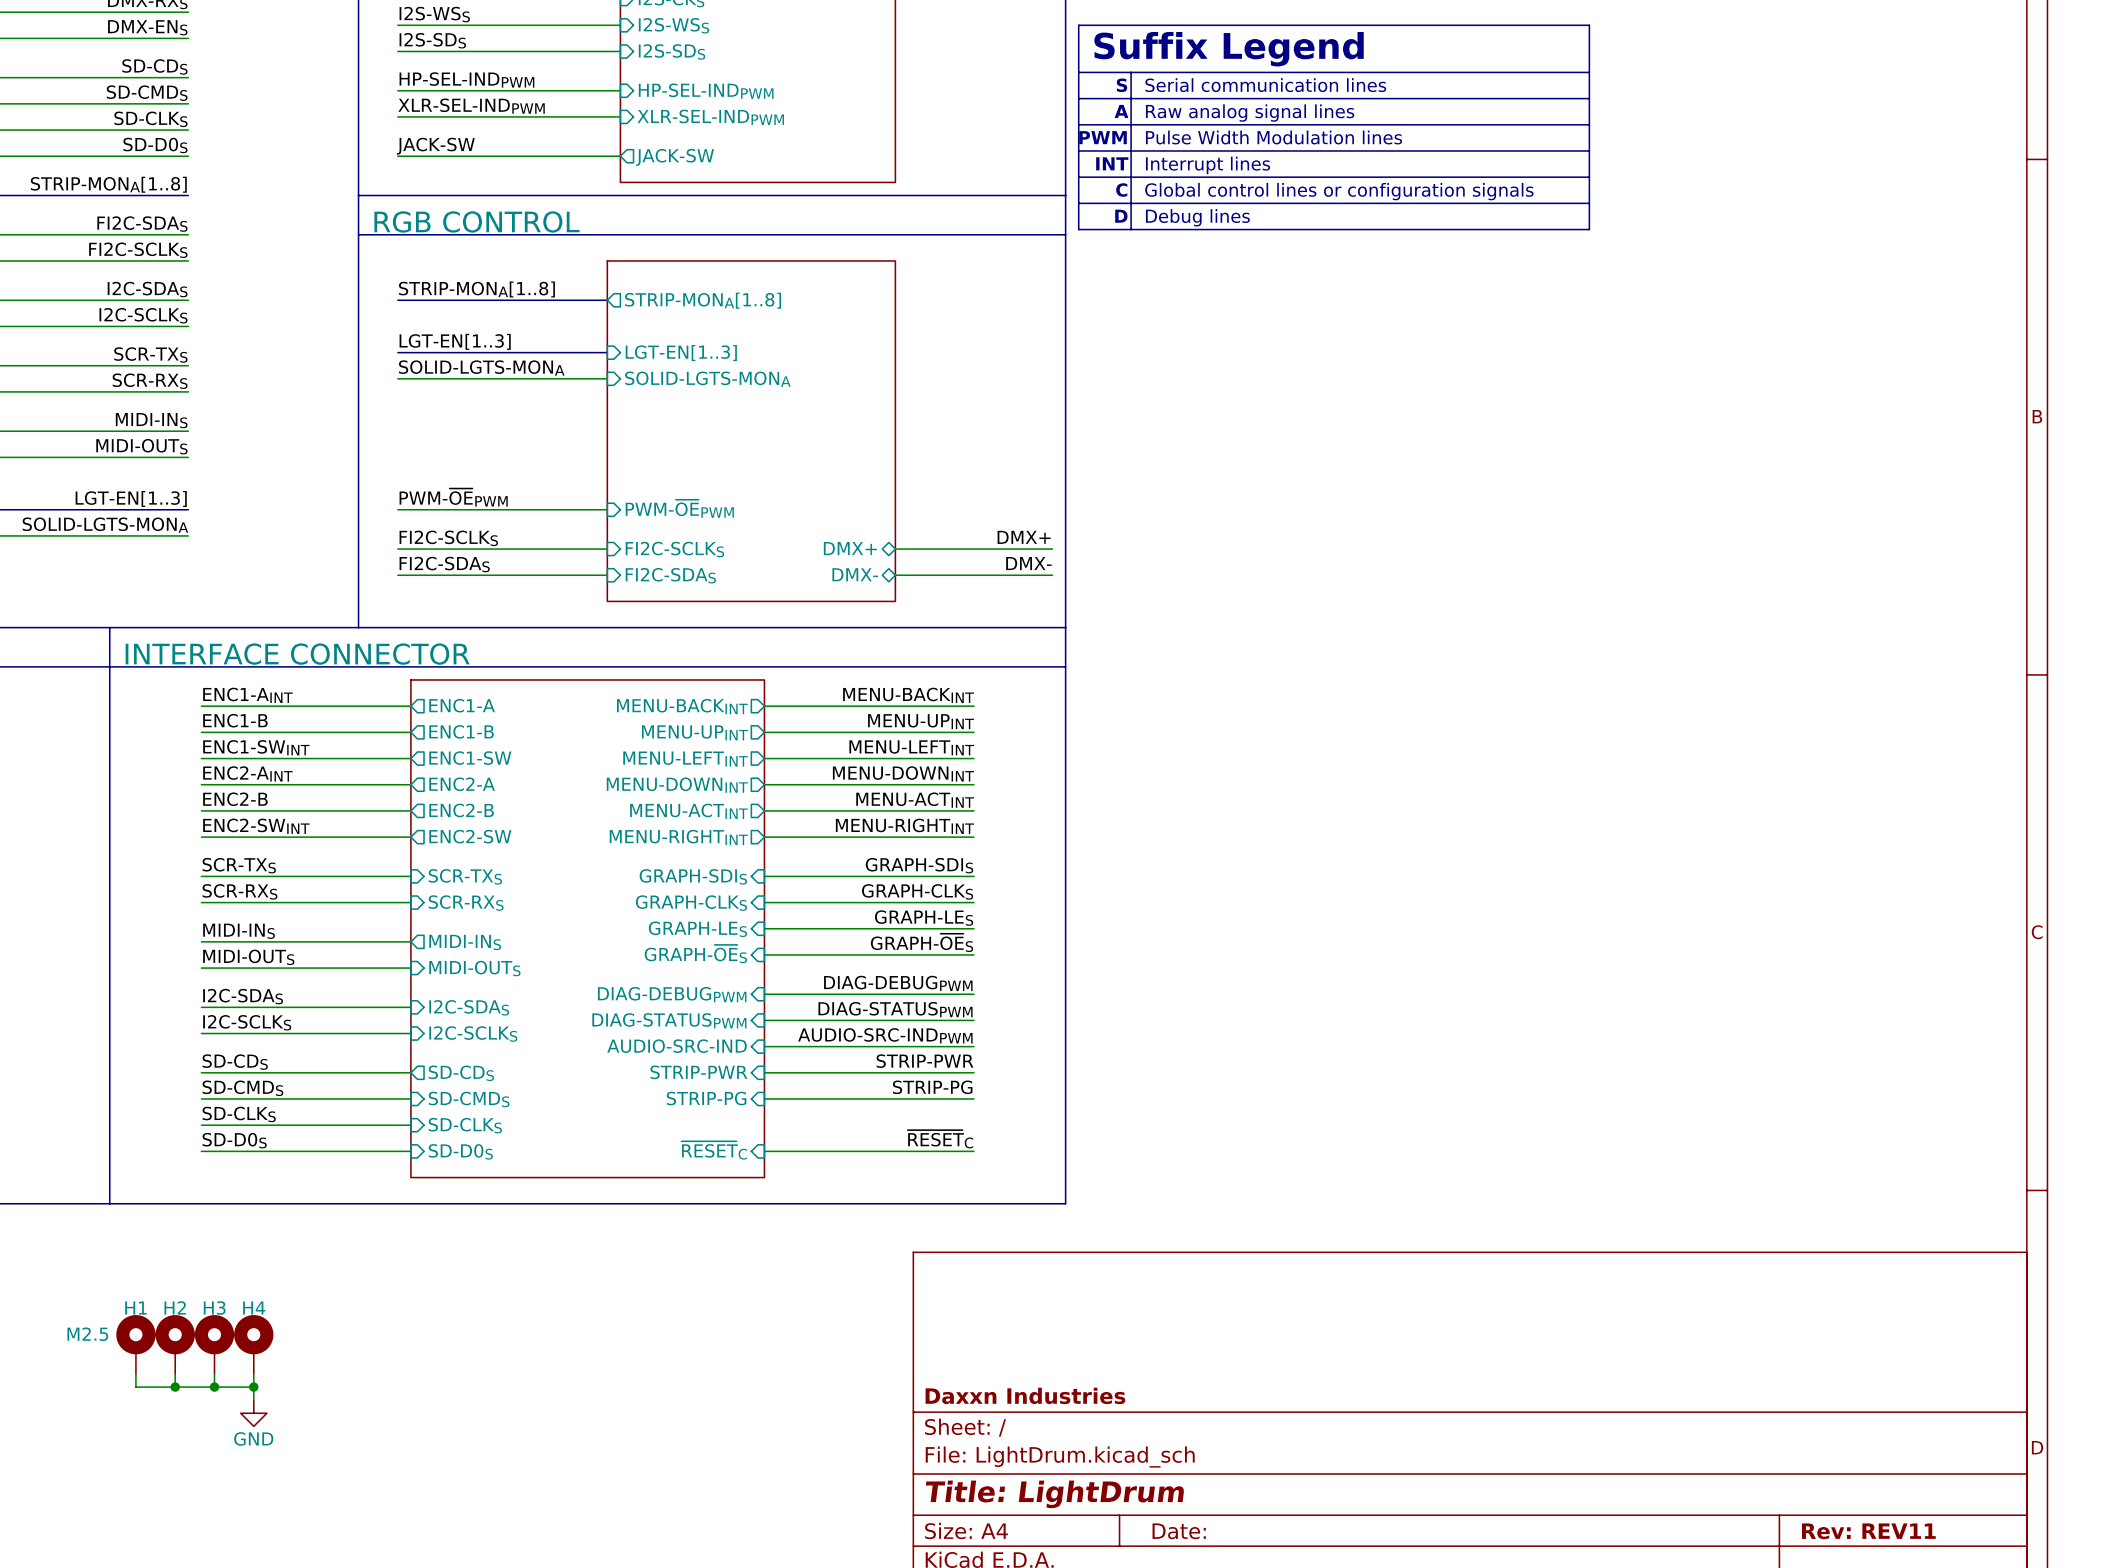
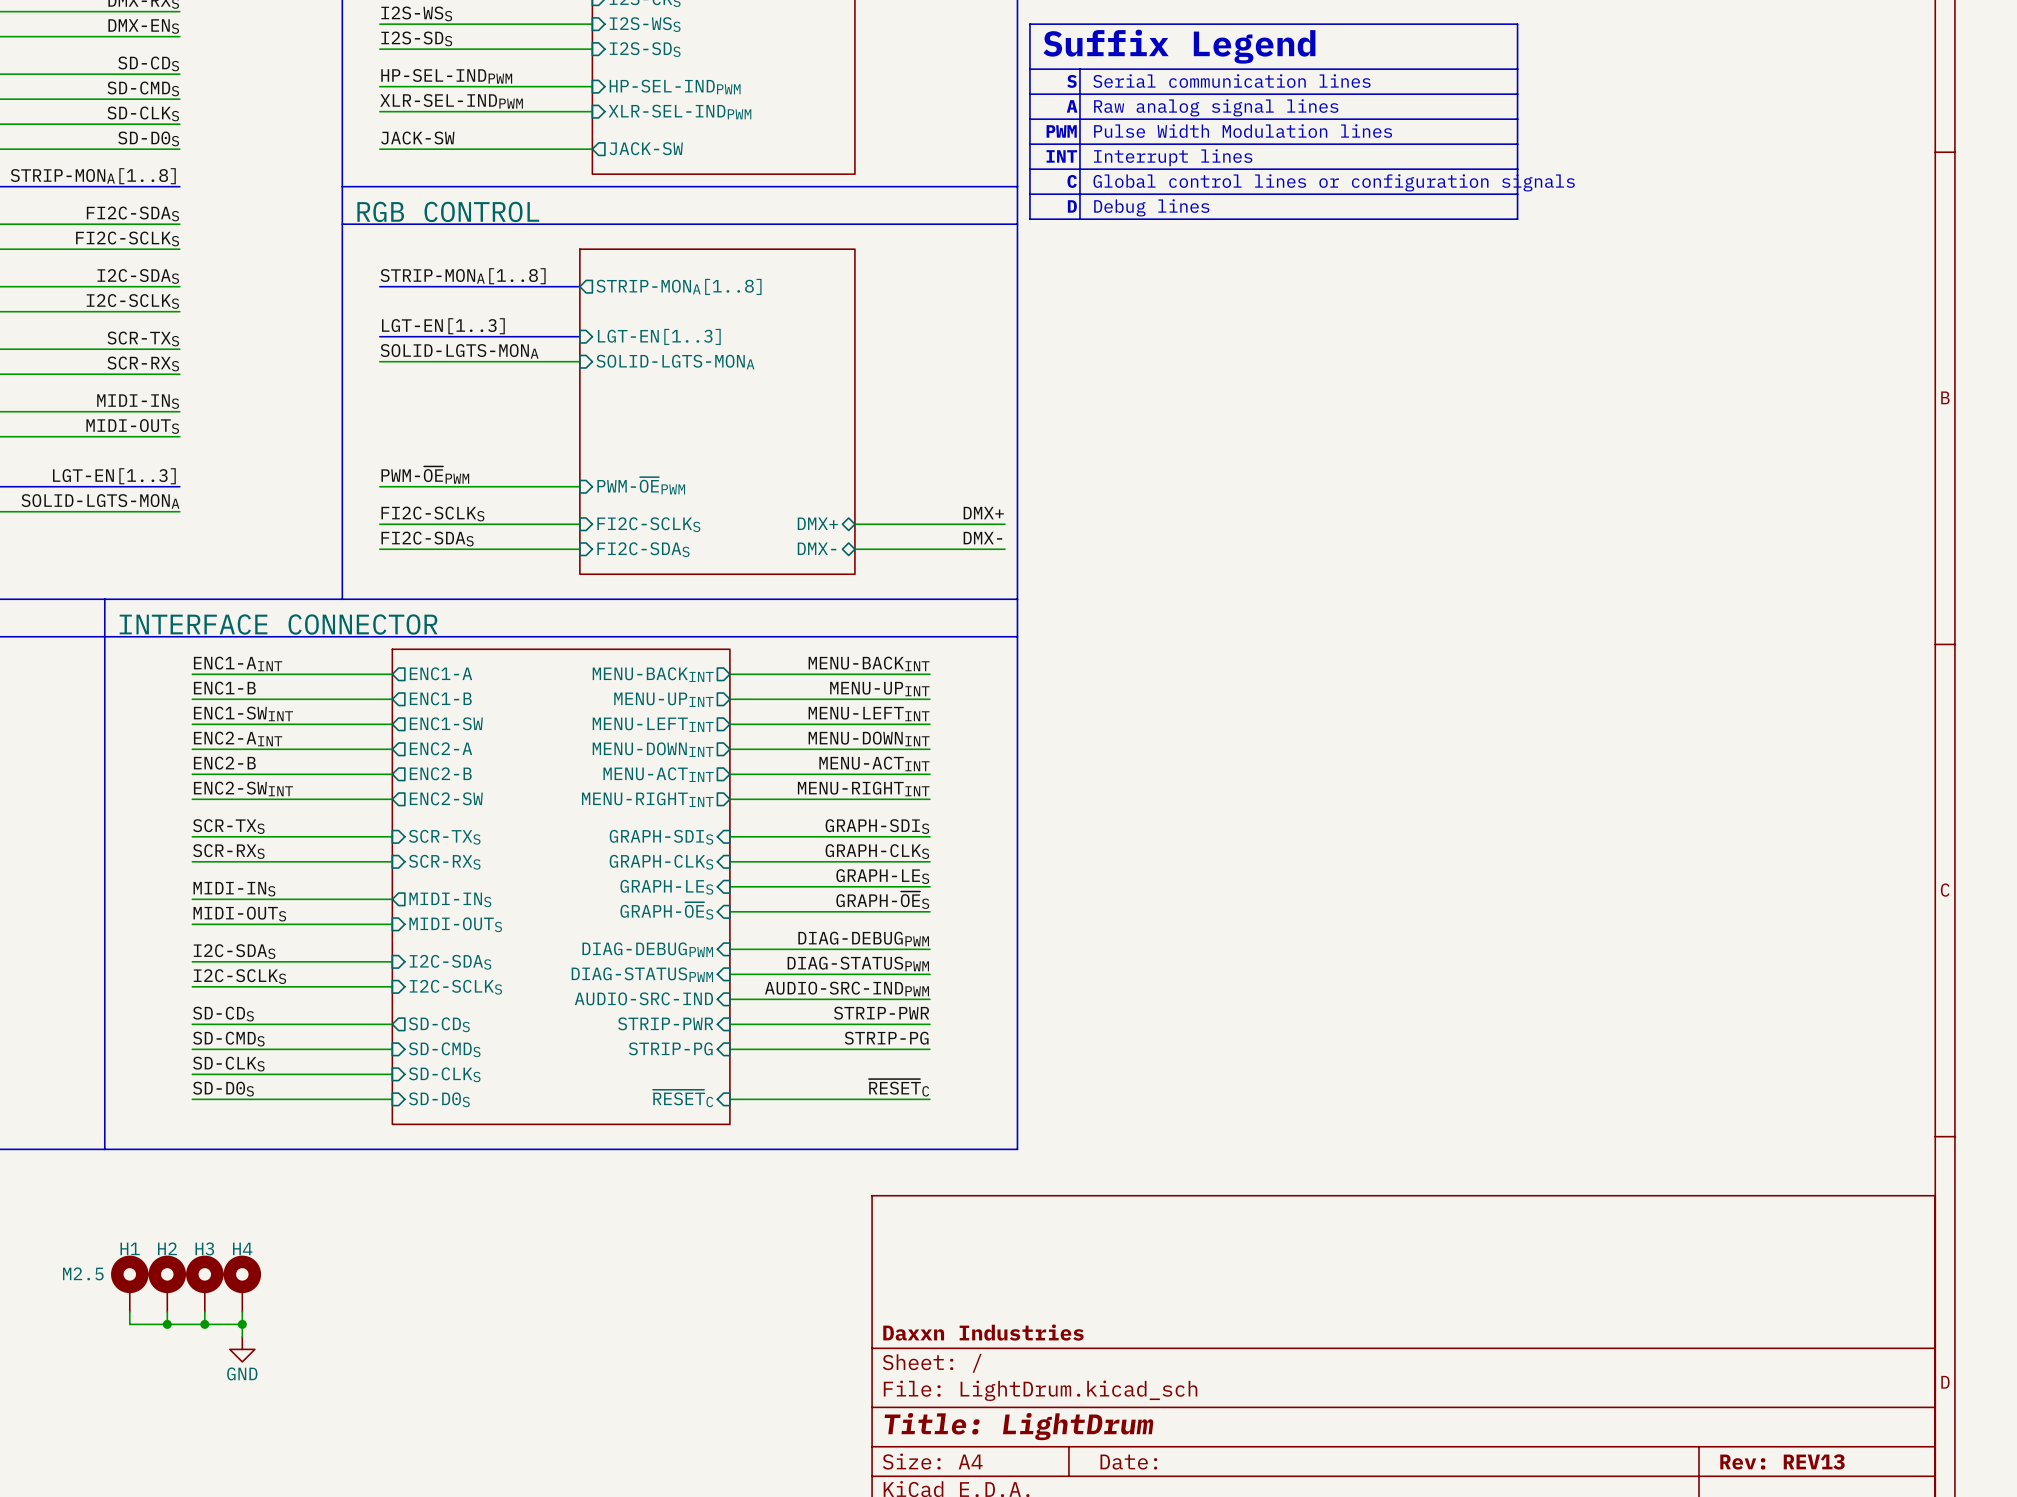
title block: Rev: REV11 (1868, 1531) -> Rev: REV13 (1782, 1461)

